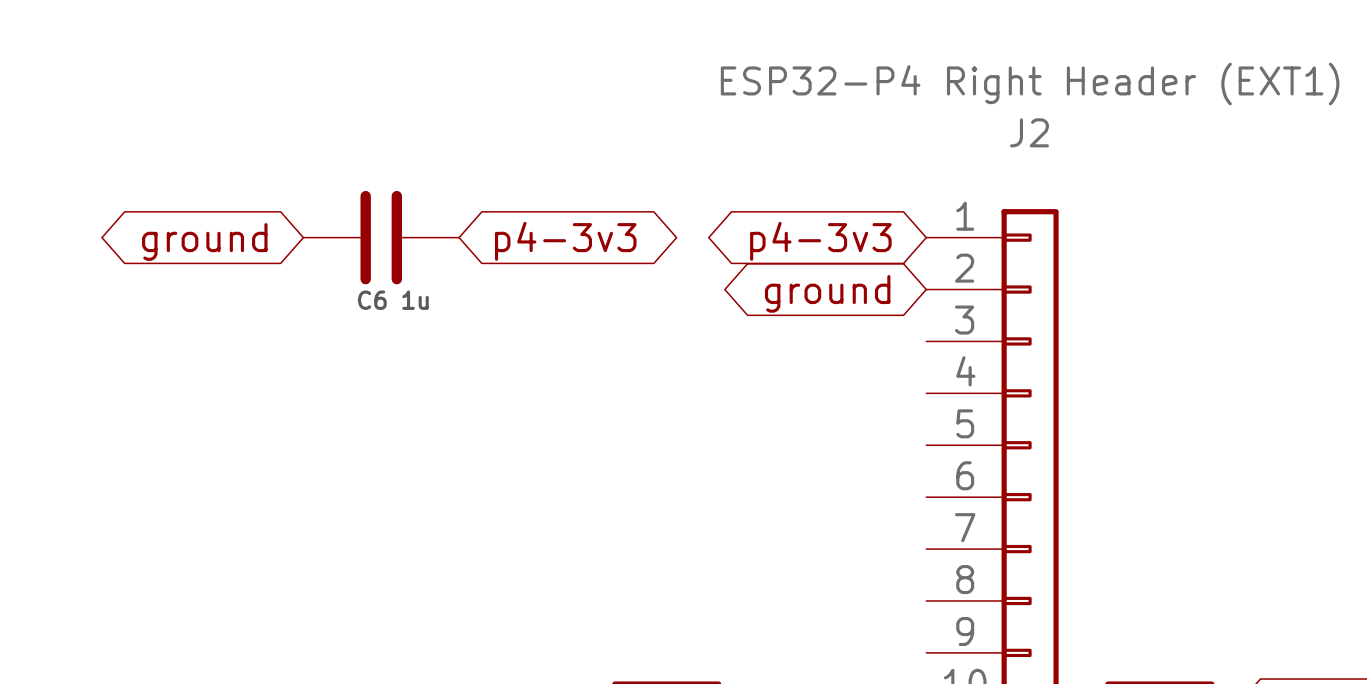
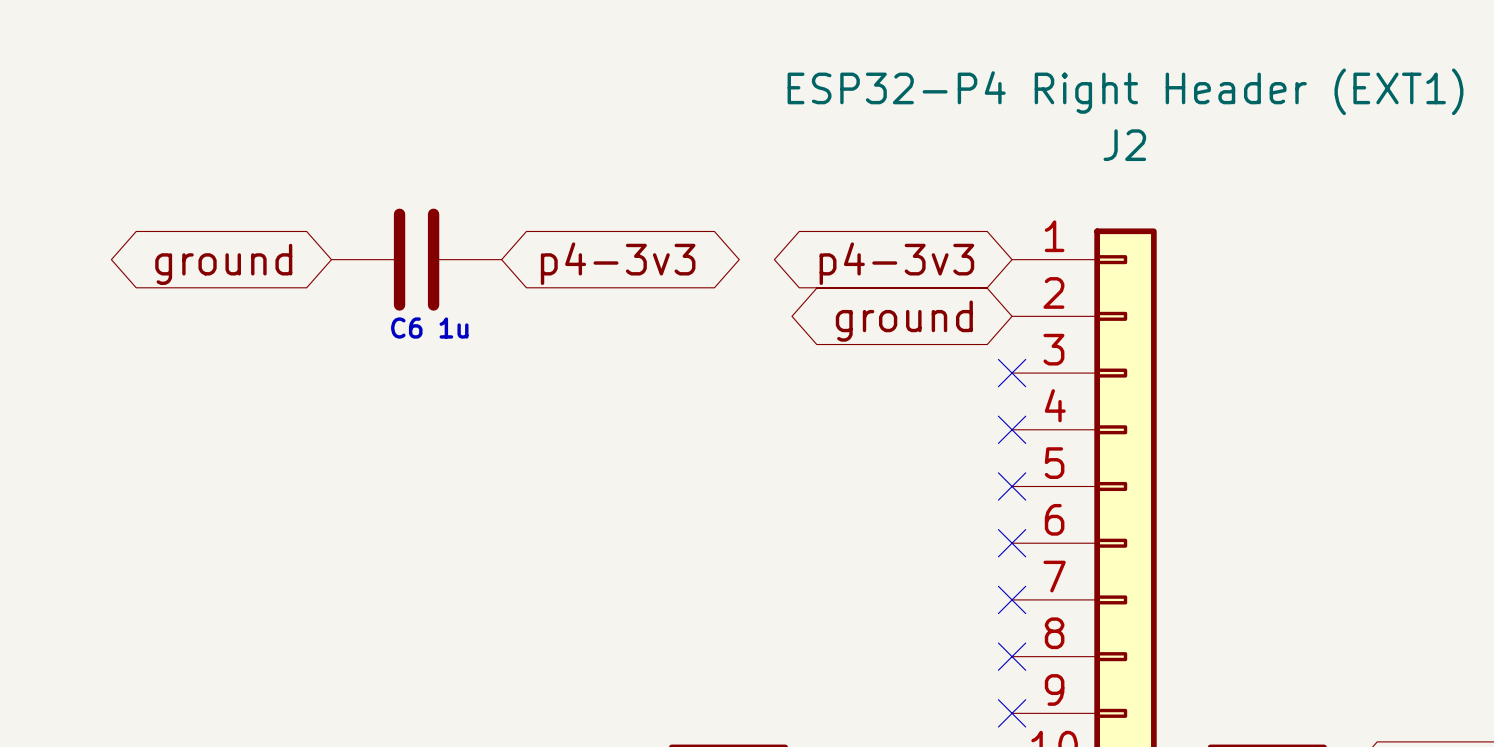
no-connect mark: none -> (1012, 373)
no-connect mark: none -> (1012, 429)
no-connect mark: none -> (1012, 486)
no-connect mark: none -> (1012, 543)
no-connect mark: none -> (1012, 599)
no-connect mark: none -> (1012, 656)
no-connect mark: none -> (1012, 713)

